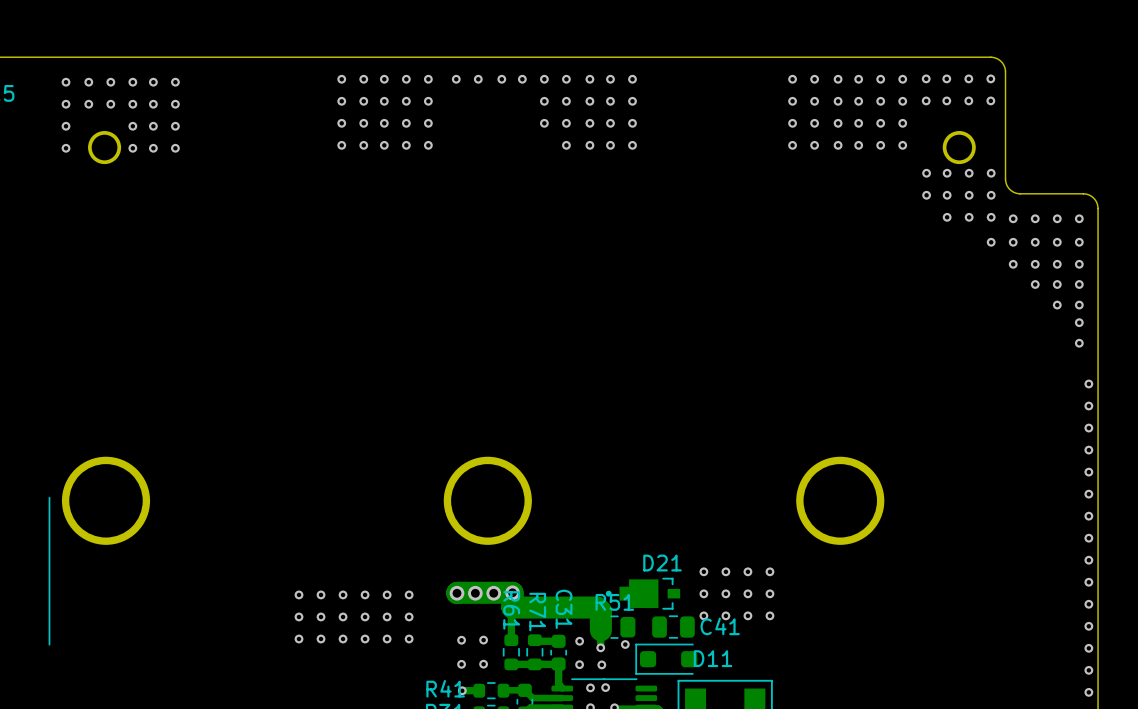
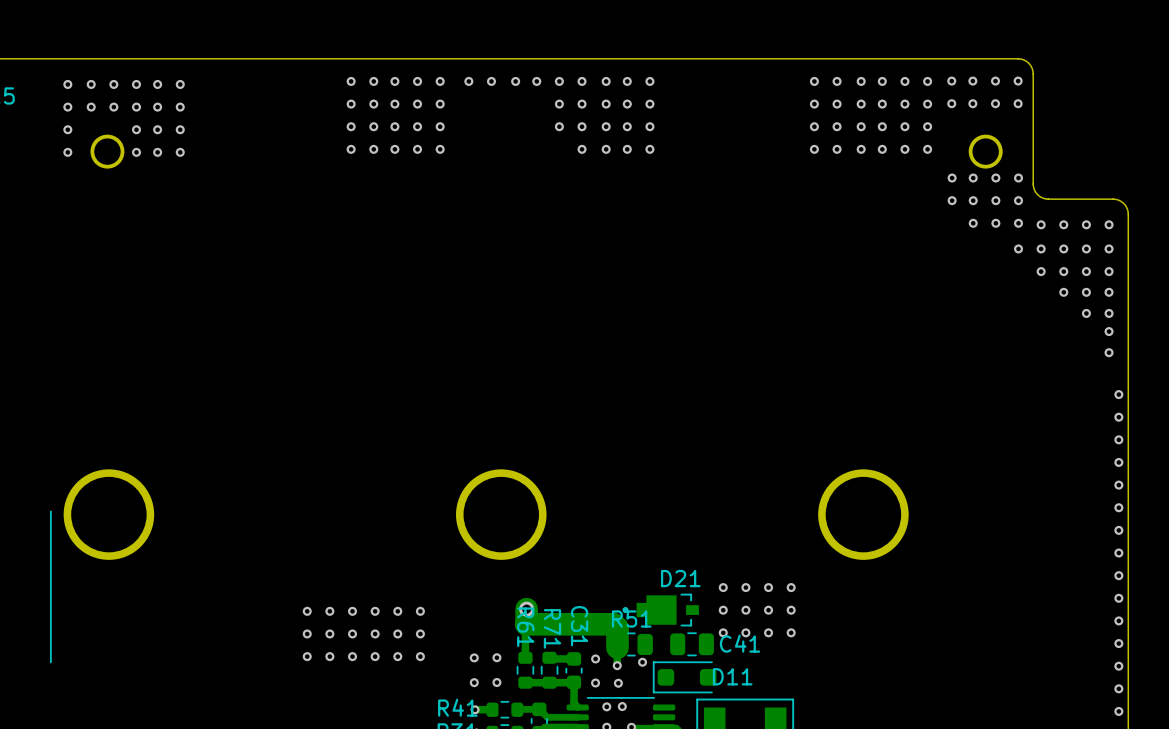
track: (512, 592) (457, 593) -> none
via: (457, 593) -> none
via: (475, 593) -> none
via: (493, 593) -> none

